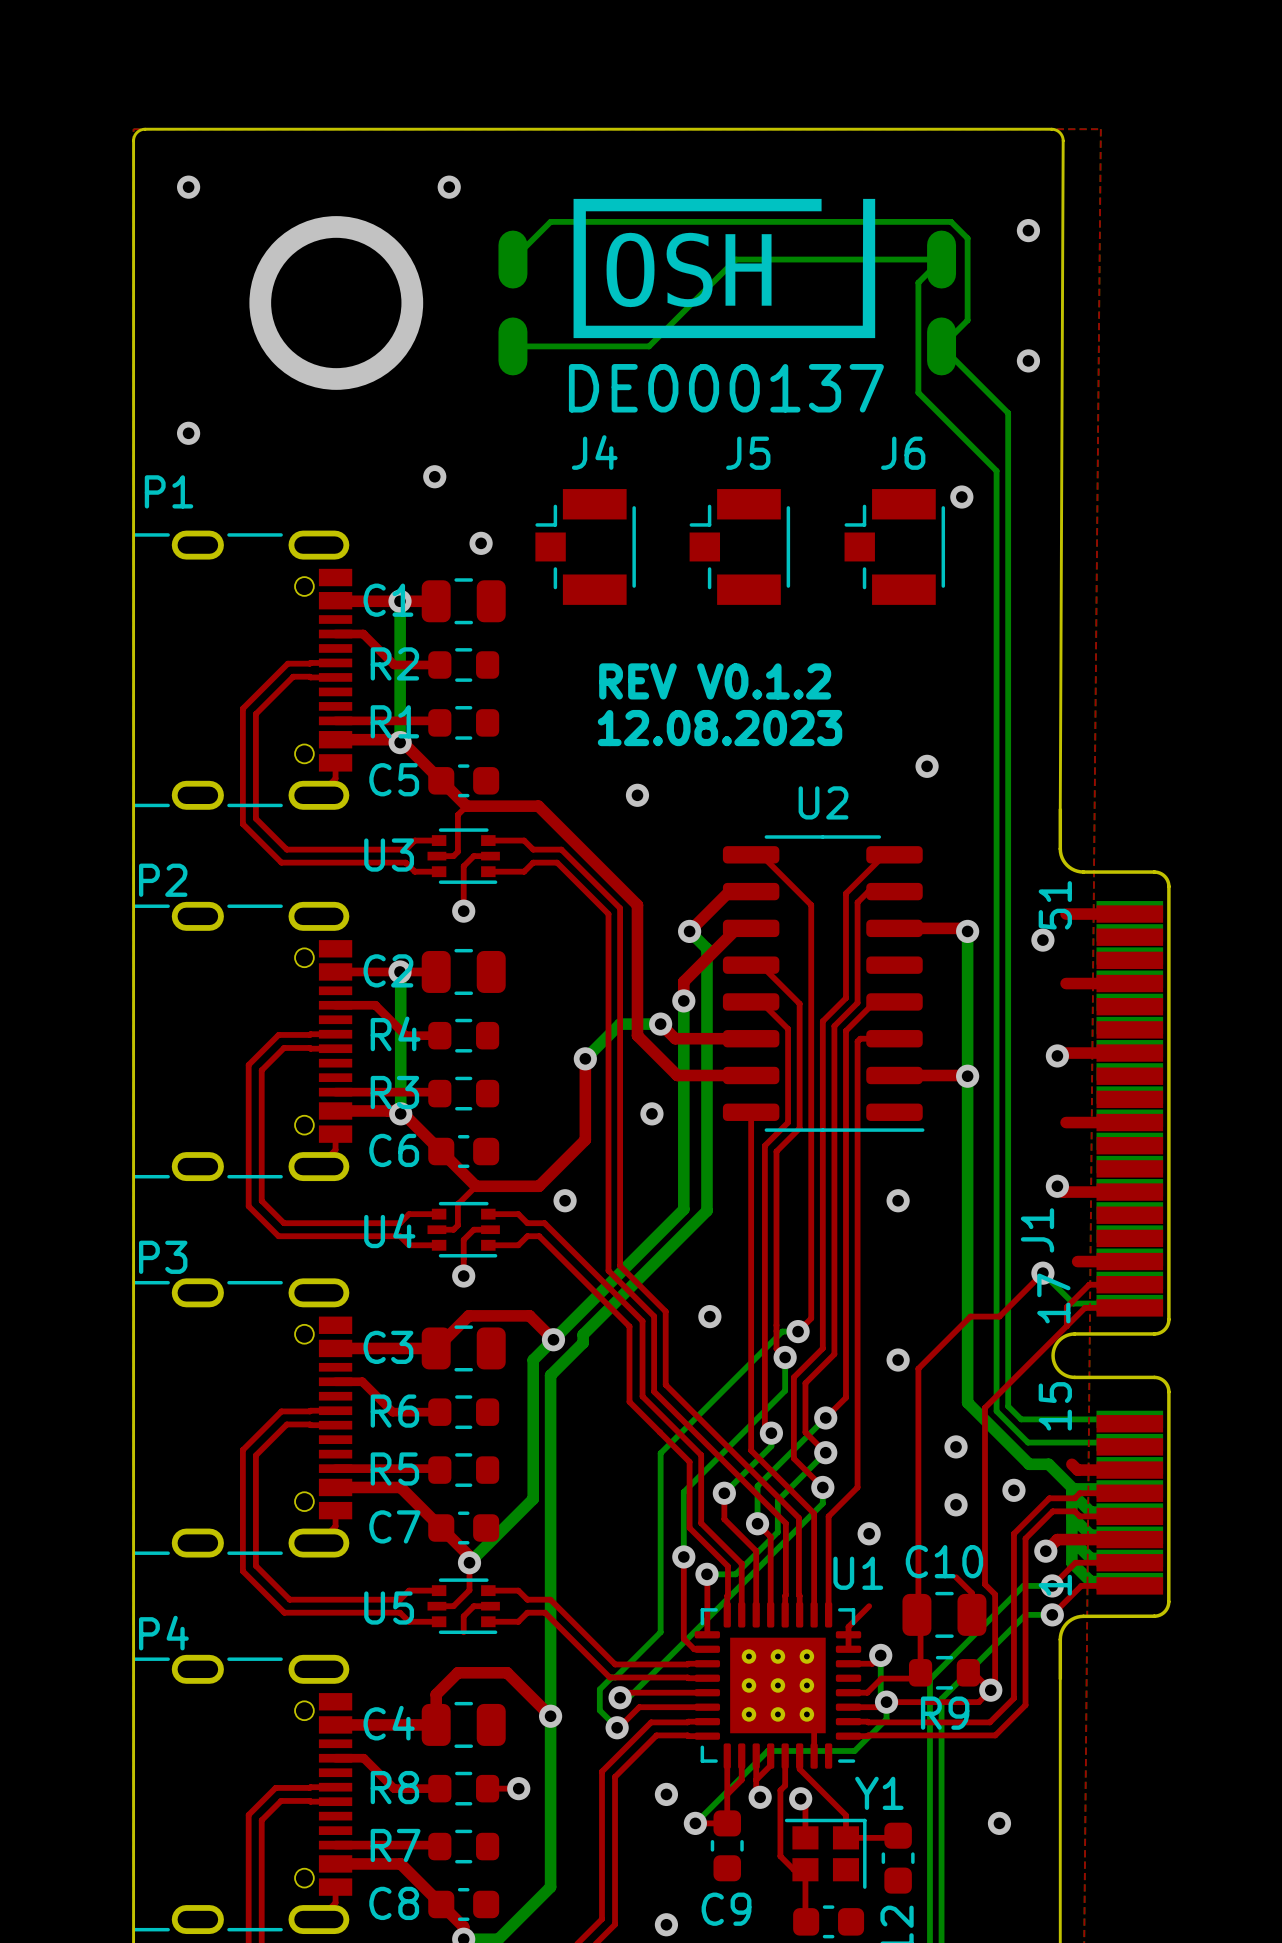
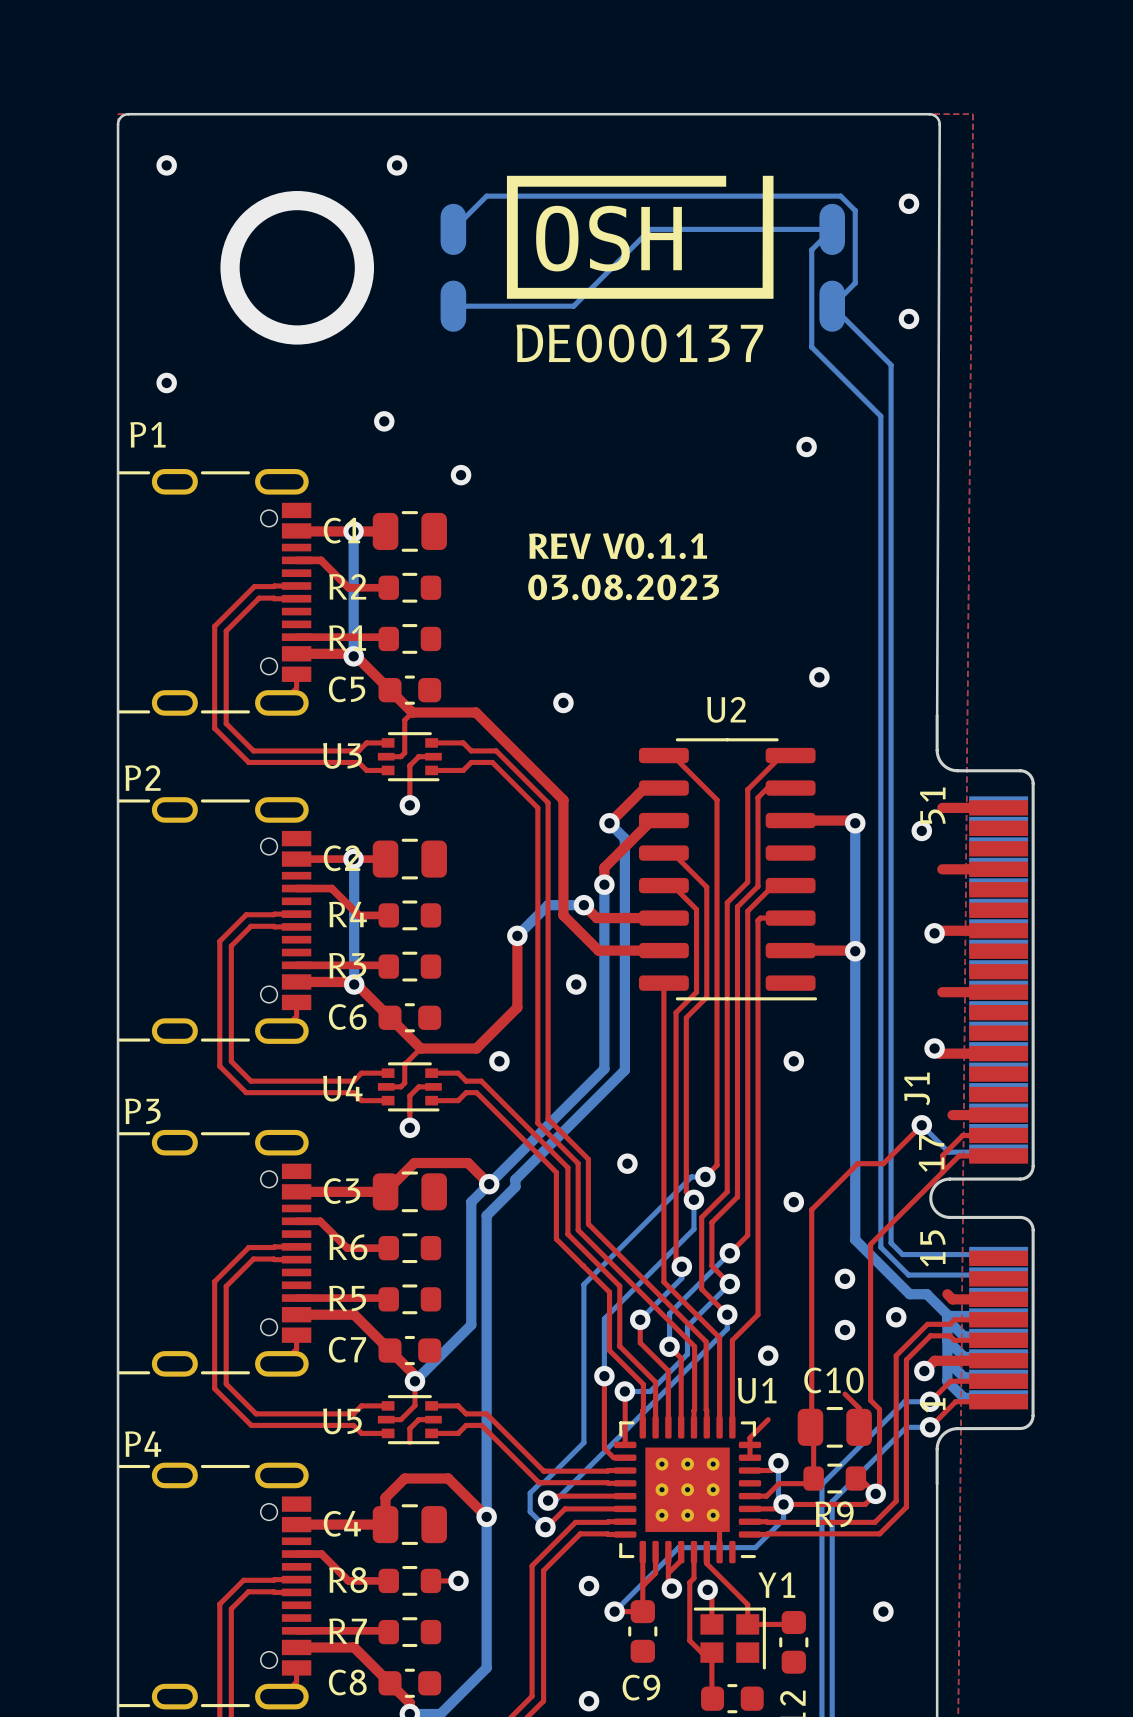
via position: (961, 497) -> (806, 446)
via position: (481, 543) -> (461, 475)
J4: (585, 546) -> none
J5: (739, 546) -> none
J6: (894, 546) -> none
text: none -> REV V0.1.1 (618, 546)
text: REV V0.1.2 (715, 681) -> 03.08.2023 (623, 587)
text: 12.08.2023 (720, 728) -> none

